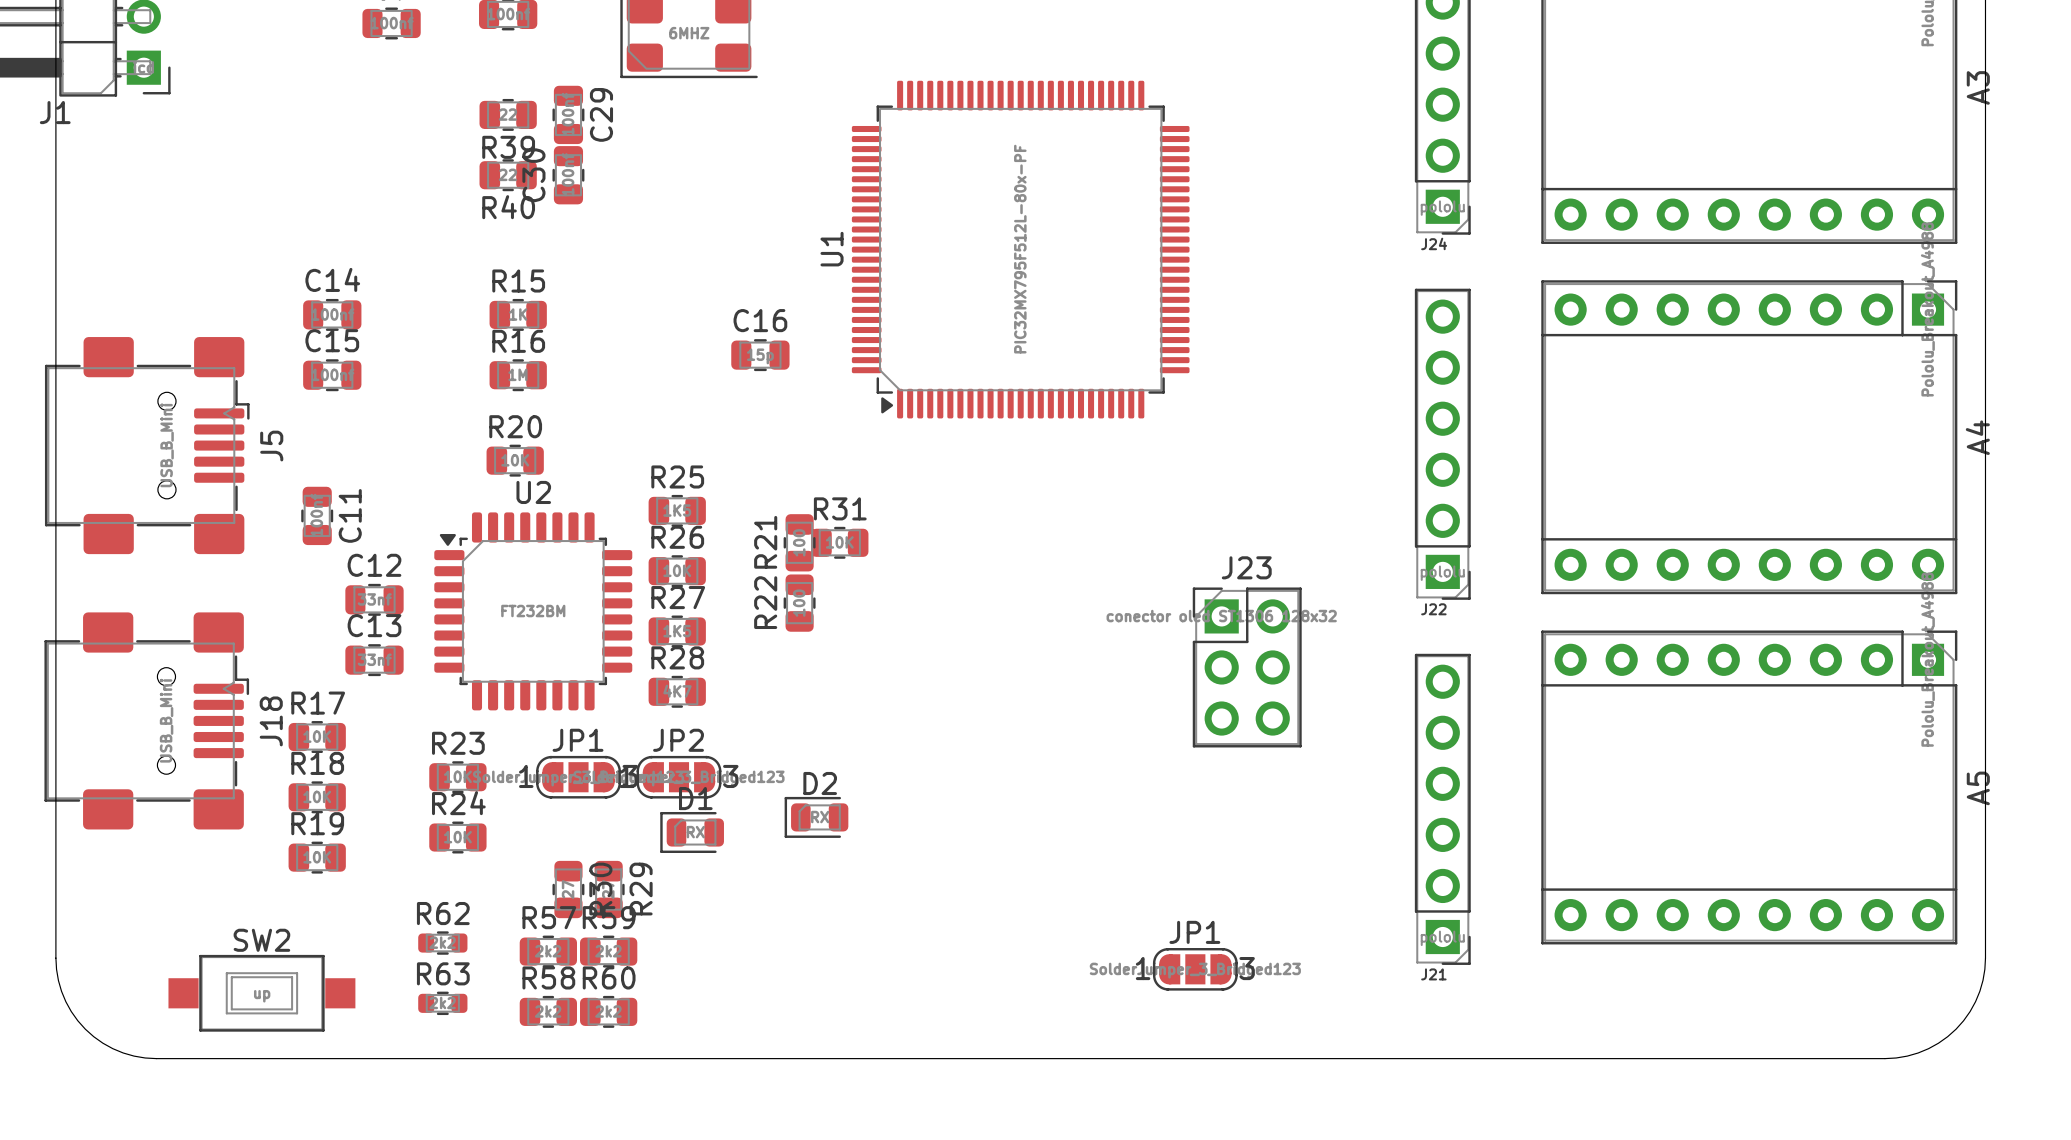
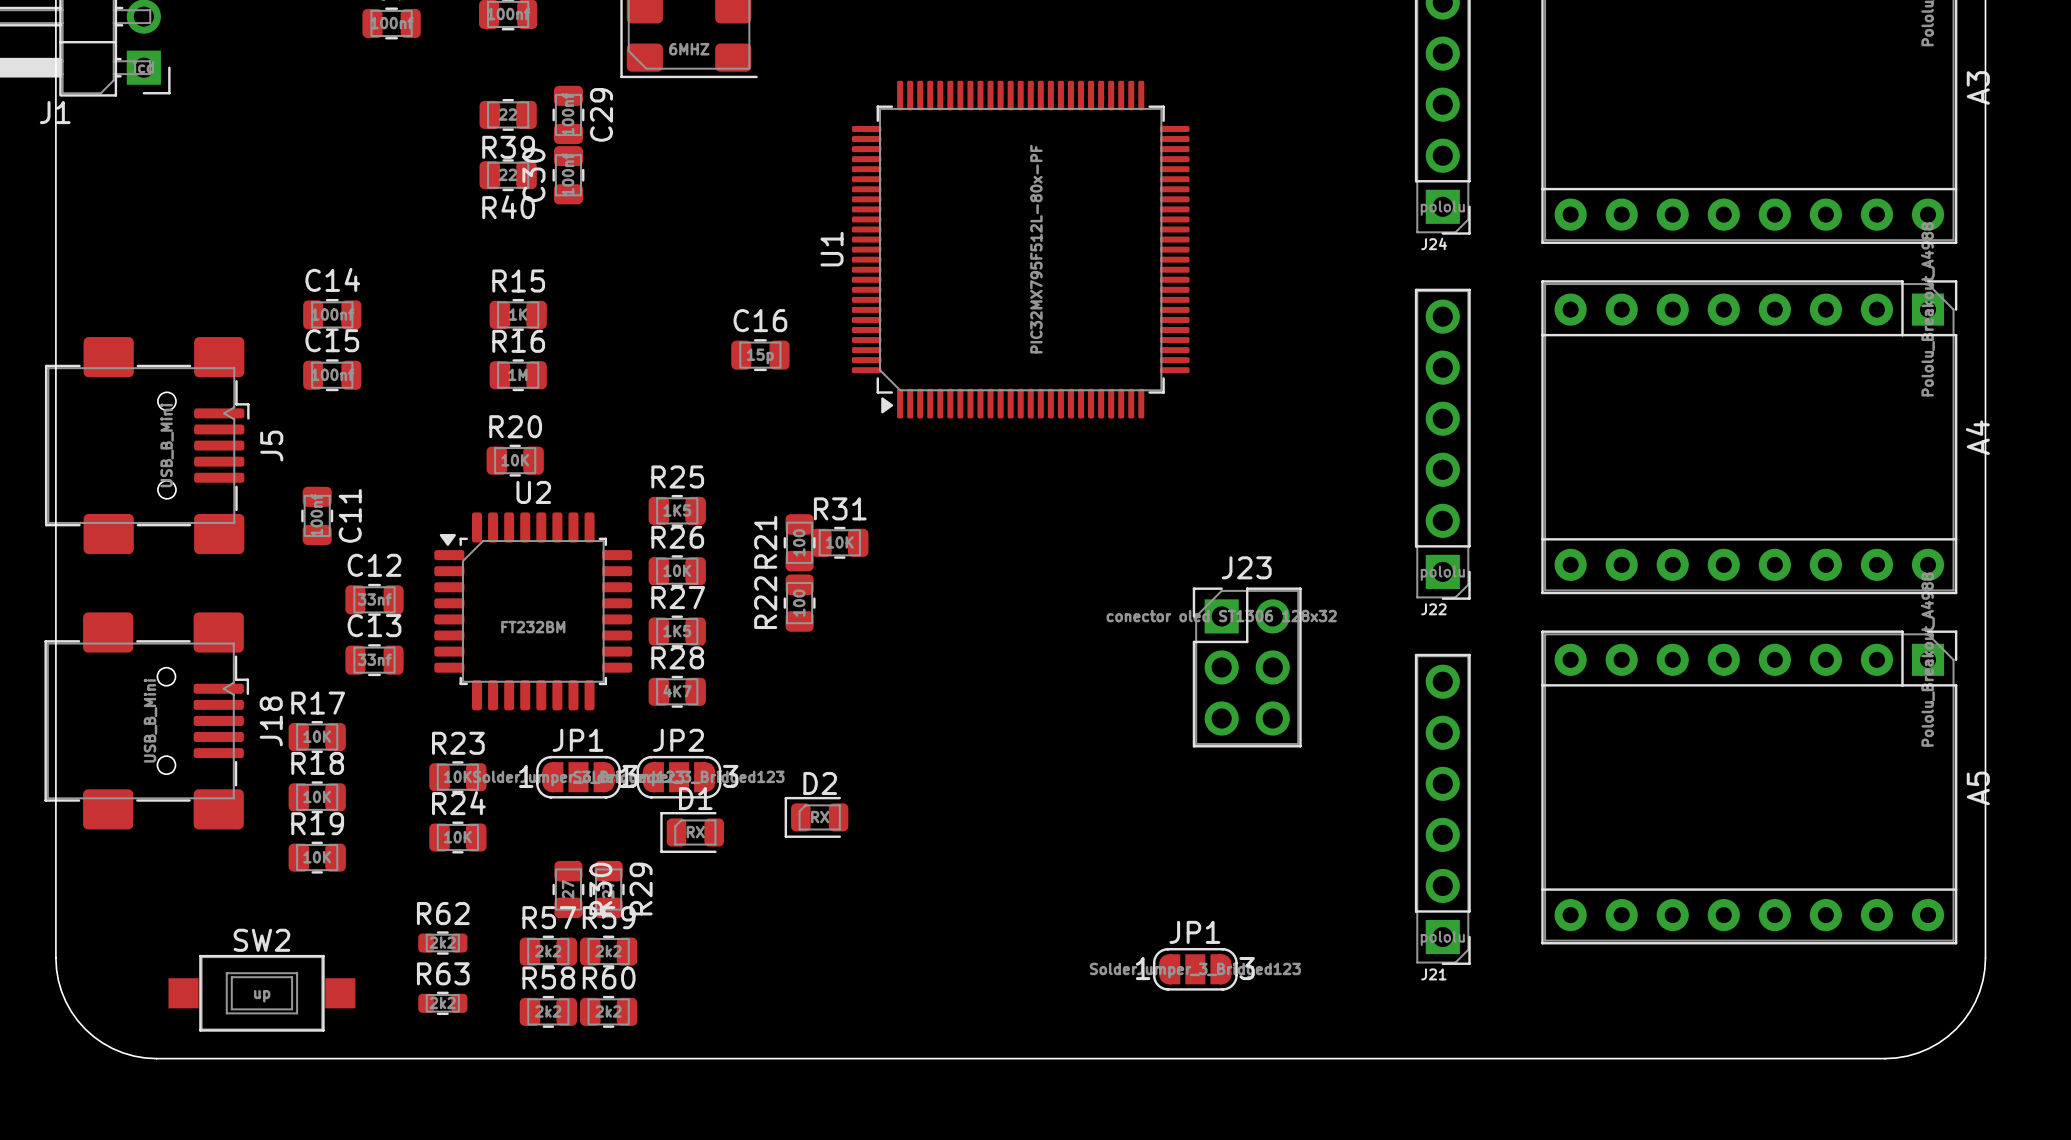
part value position: 6MHZ (689, 33) -> 6MHZ (689, 49)
U1 value position: PIC32MX795F512L-80x-PF (1020, 249) -> PIC32MX795F512L-80x-PF (1036, 249)
U2 value position: FT232BM (533, 611) -> FT232BM (533, 627)
J18 value position: USB_B_Mini (166, 720) -> USB_B_Mini (150, 720)

